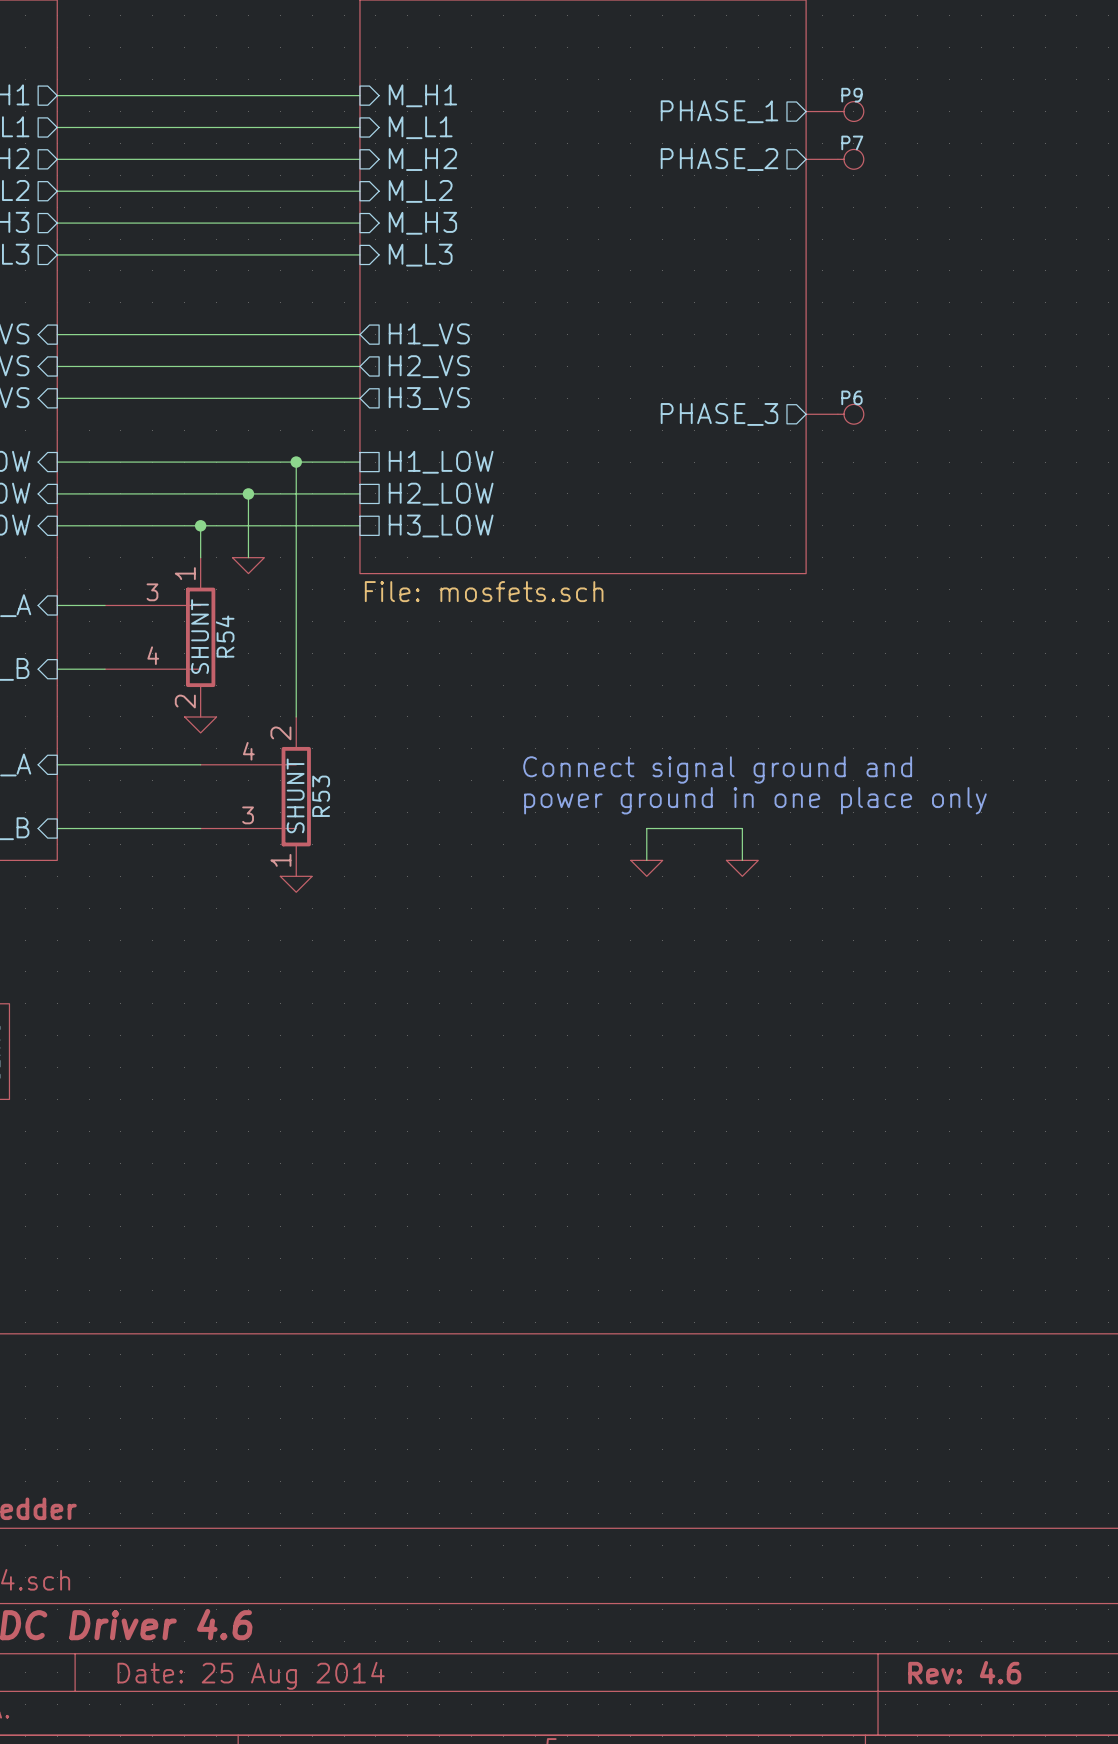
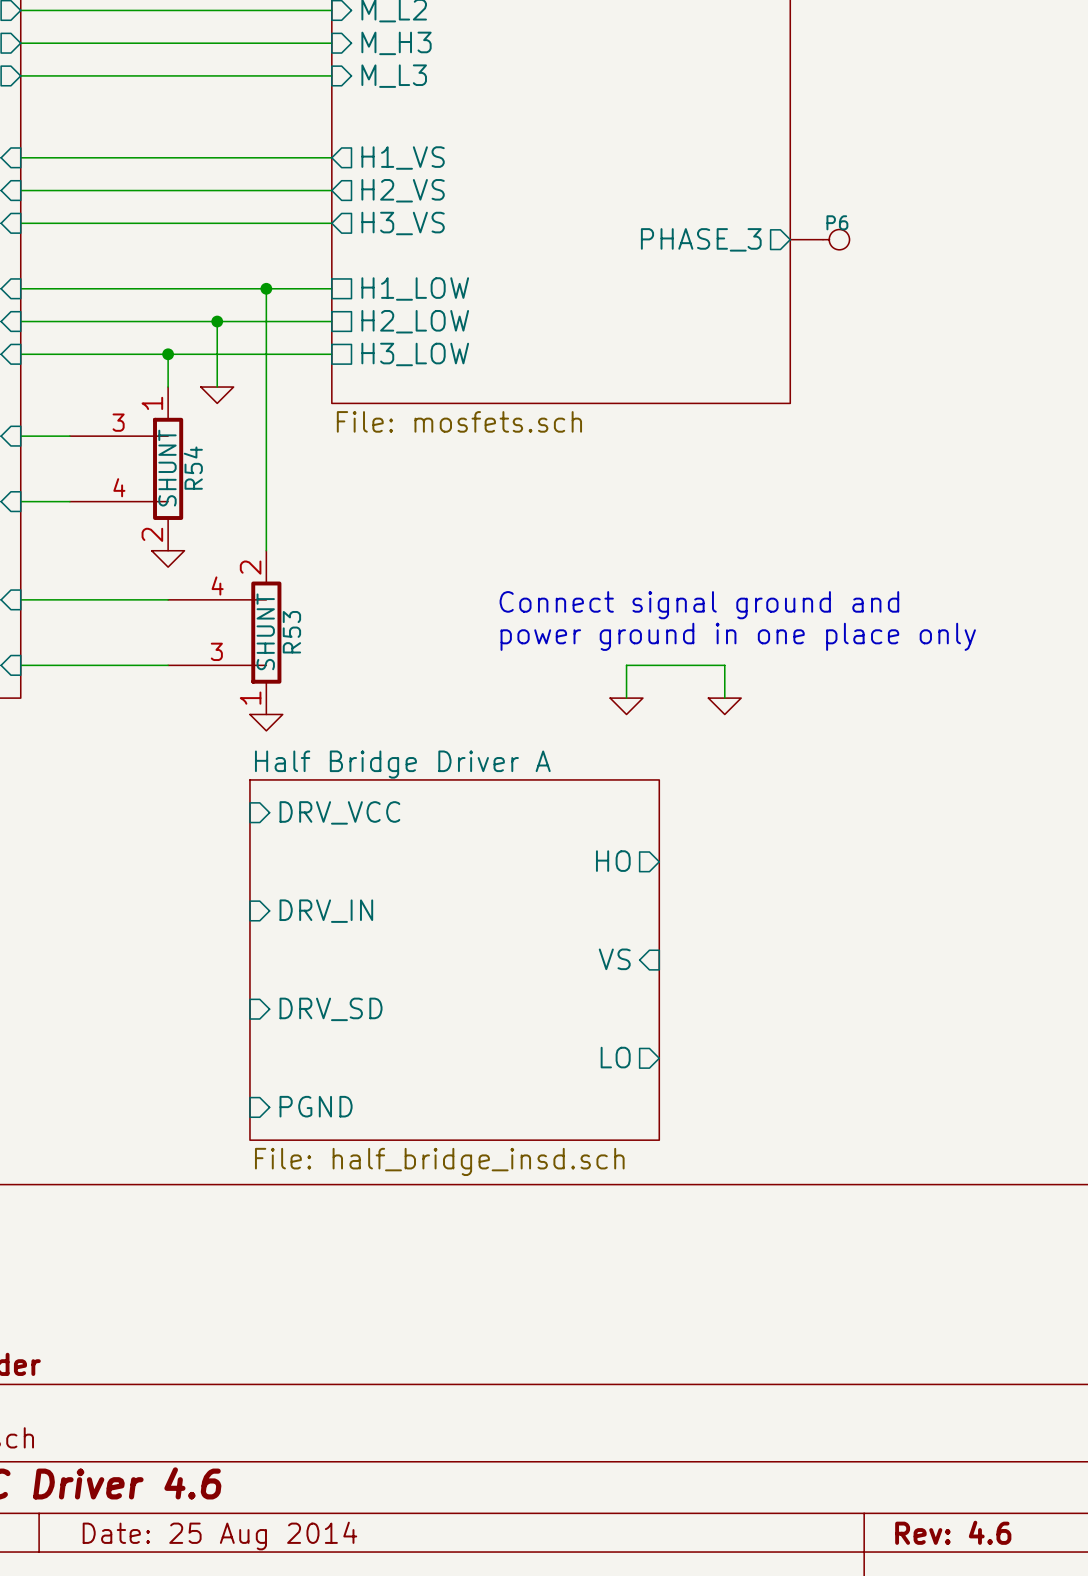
sheet pin: none -> DRV_VCC (339, 812)
sheet pin: none -> HO (613, 861)
sheet pin: none -> DRV_IN (326, 911)
sheet pin: none -> VS (614, 959)
sheet Half Bridge Driver A: none -> File: half_bridge_insd.sch (454, 960)
sheet pin: none -> DRV_SD (331, 1009)
sheet pin: none -> LO (615, 1057)
sheet pin: none -> PGND (316, 1106)

